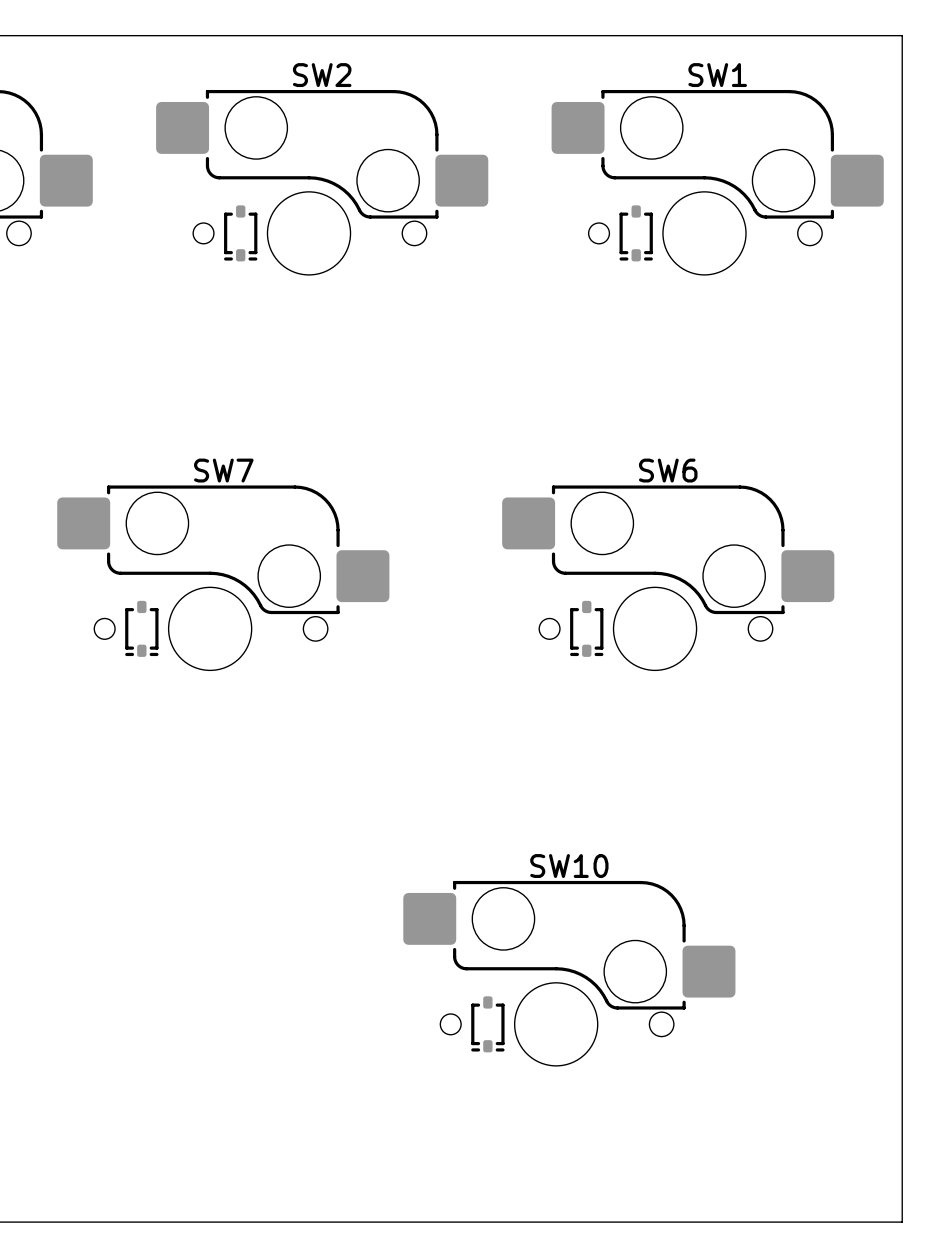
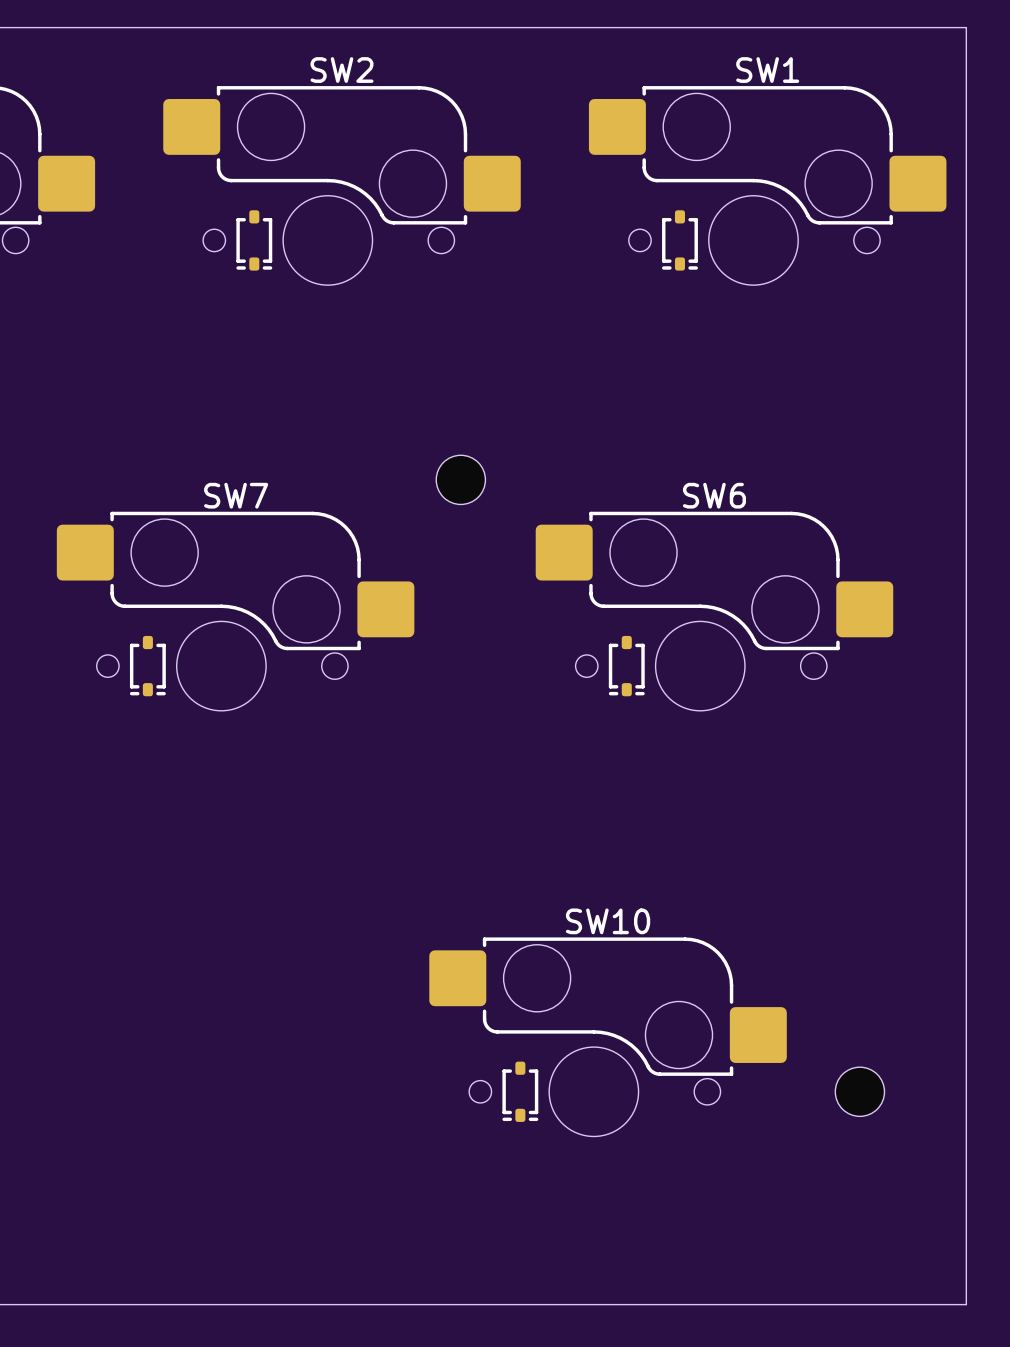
part: none -> (460, 479)
part: none -> (859, 1091)

